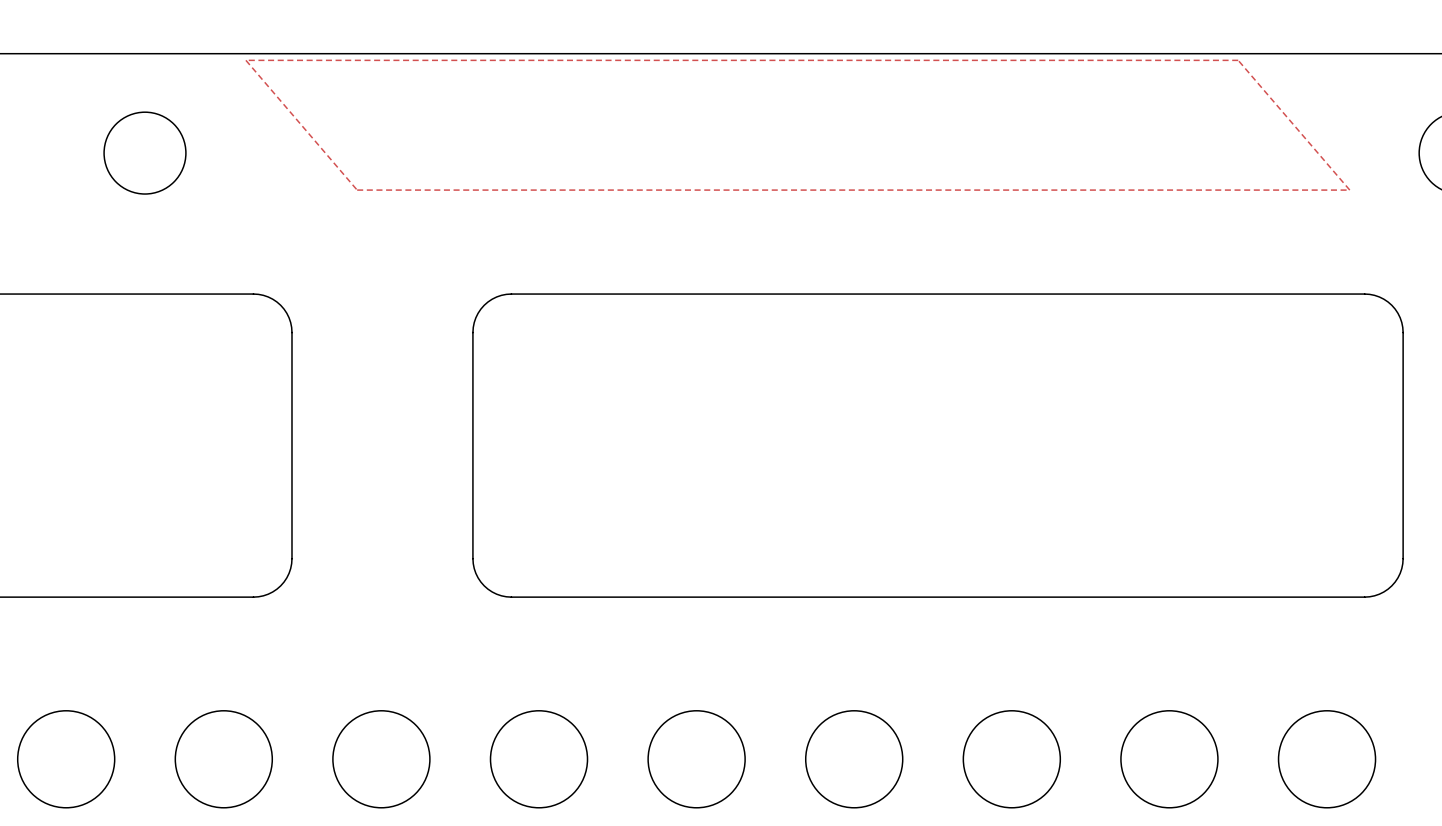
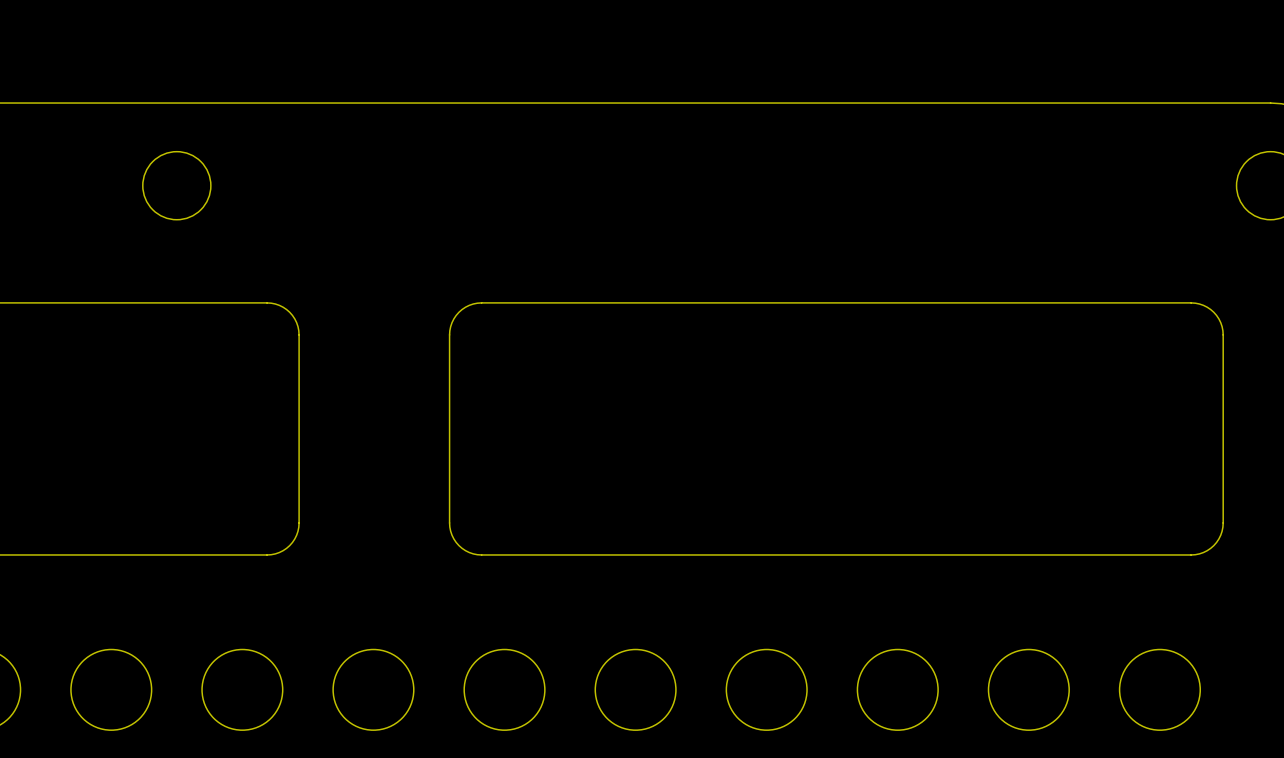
top zone outline: (1238, 60) (245, 60) (357, 190) (1349, 190) (1238, 60) -> none

